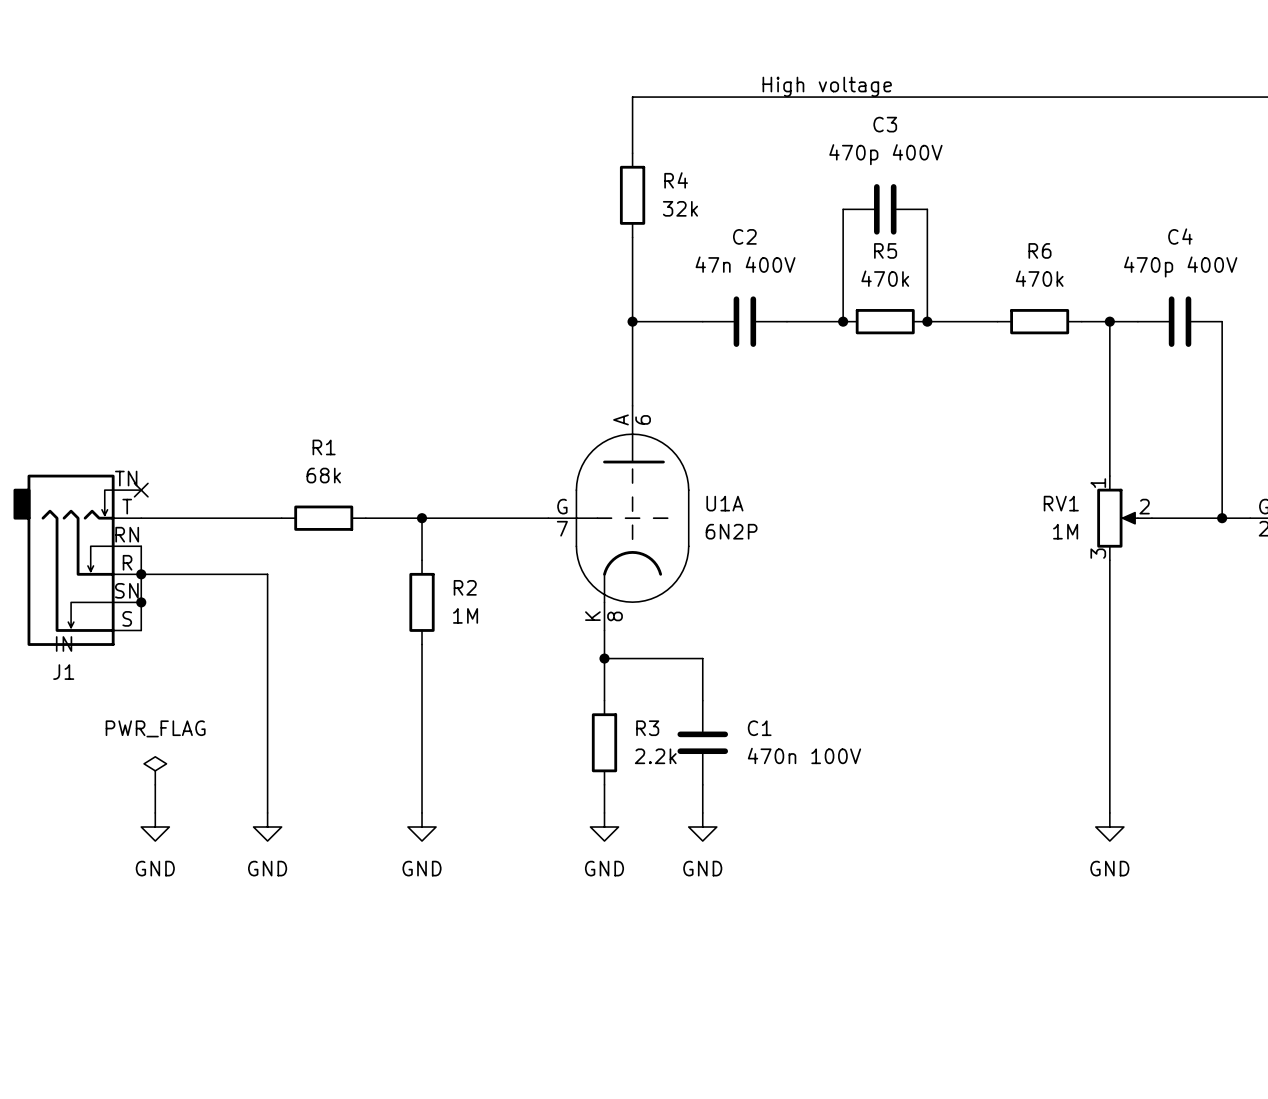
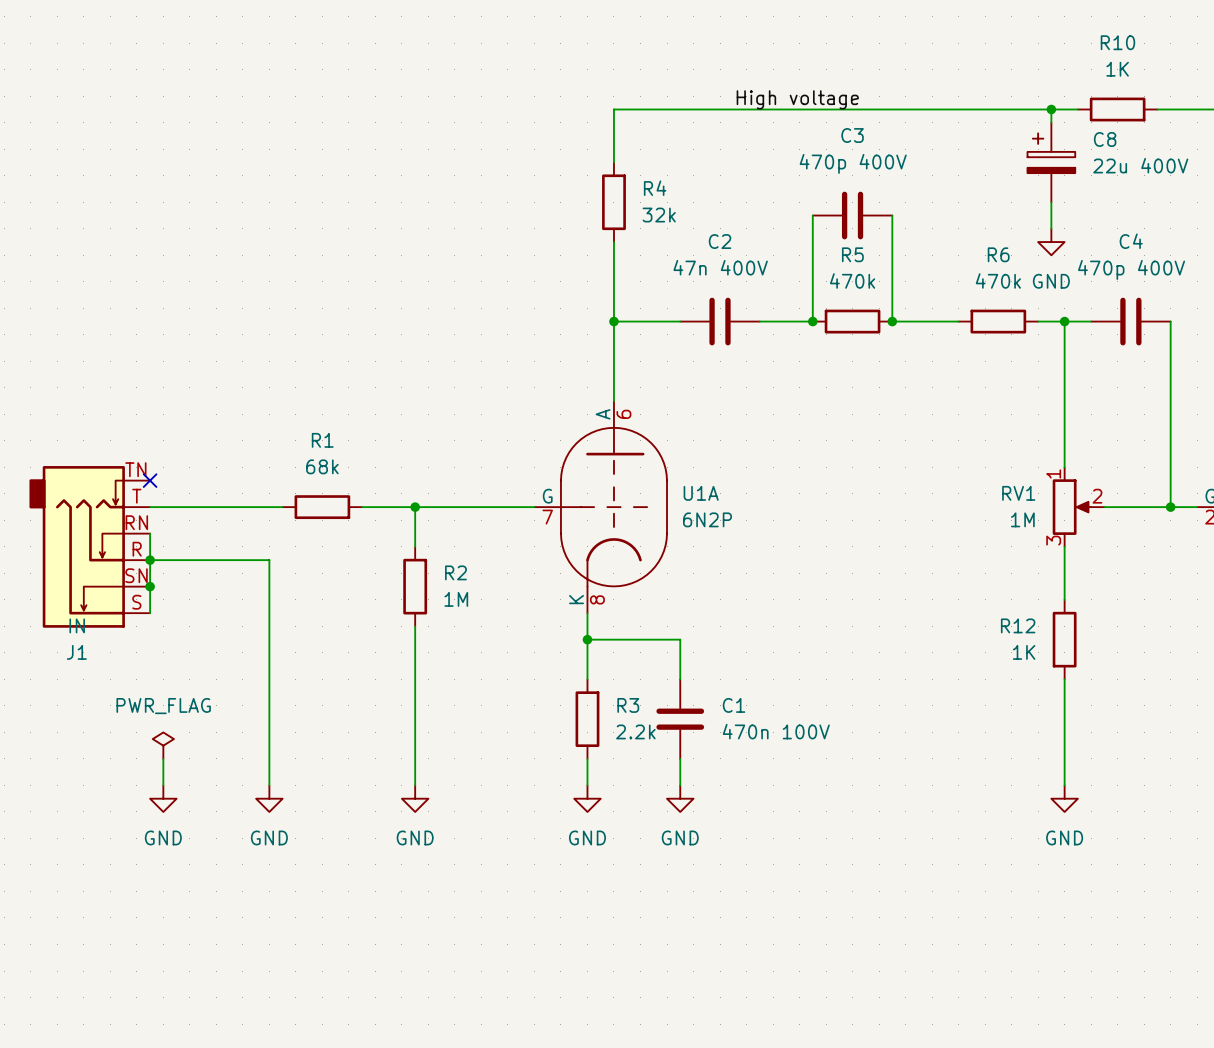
wire: none -> (1051, 109) (1051, 122)
junction: none -> (1051, 109)
wire: (1123, 97) (1208, 97) -> none
R10: none -> 1K (1117, 109)
C8: none -> 22u 400V (1051, 162)
wire: none -> (1051, 202) (1051, 228)
power symbol: none -> GND (1051, 242)
wire: (1109, 616) (1109, 700) -> none
R12: none -> 1K (1064, 639)

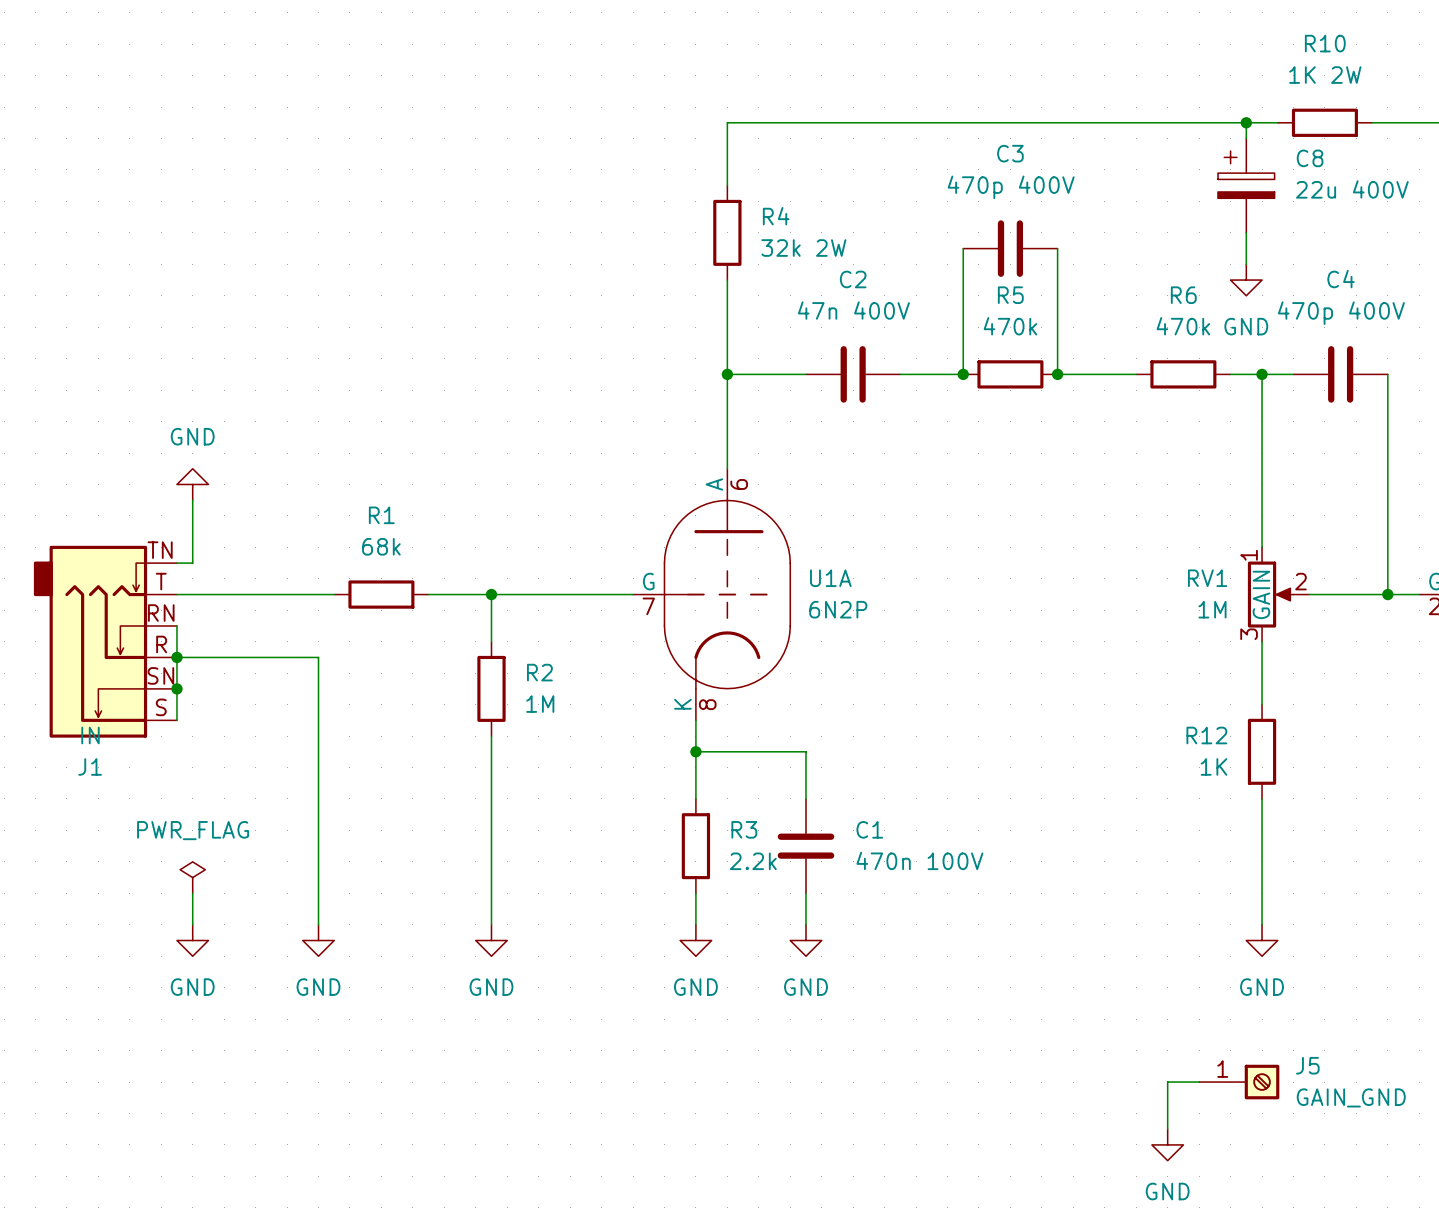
R10 value: 1K (1117, 69) -> 1K 2W (1325, 75)
label: High voltage (797, 99) -> none
R4 value: 32k (659, 215) -> 32k 2W (803, 248)
power symbol: none -> GND (192, 484)
wire: none -> (192, 500) (192, 563) (176, 563)
no-connect mark: (150, 480) -> none
RV1 text: none -> GAIN (1261, 594)
wire: none -> (1199, 1082) (1167, 1082) (1167, 1129)
J5: none -> GAIN_GND (1239, 1082)
power symbol: none -> GND (1167, 1144)

